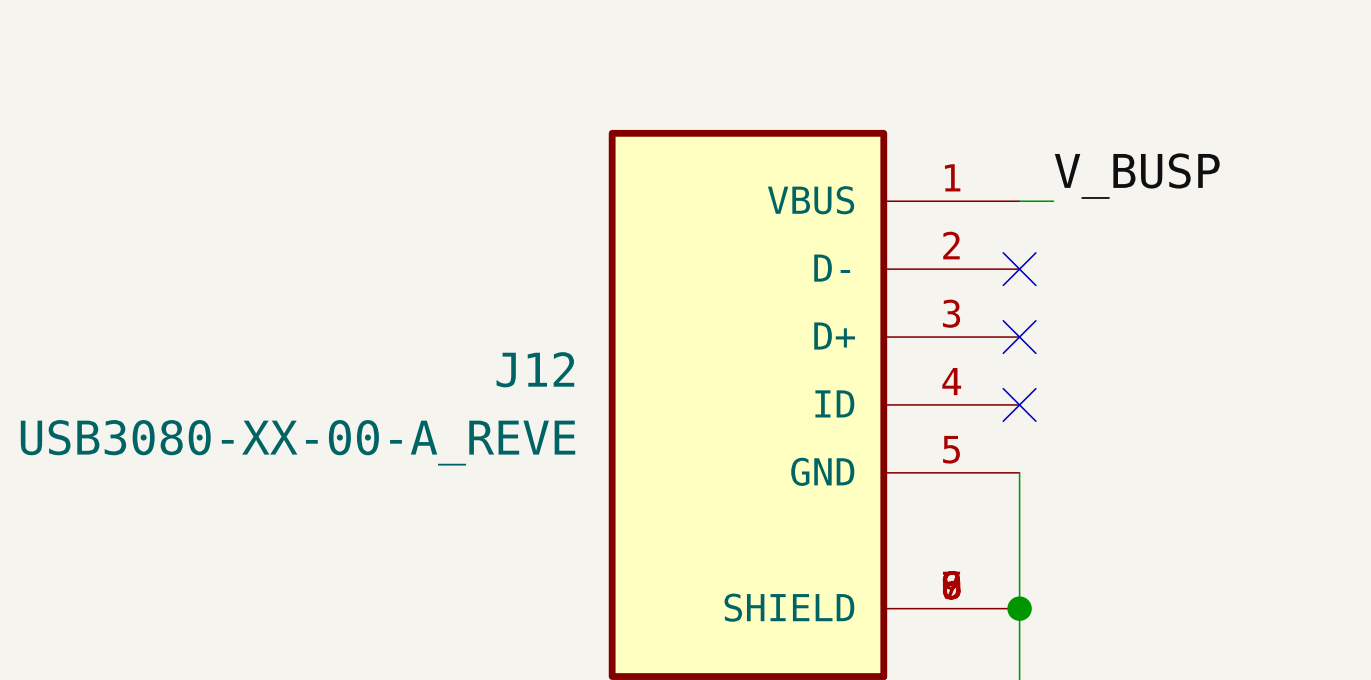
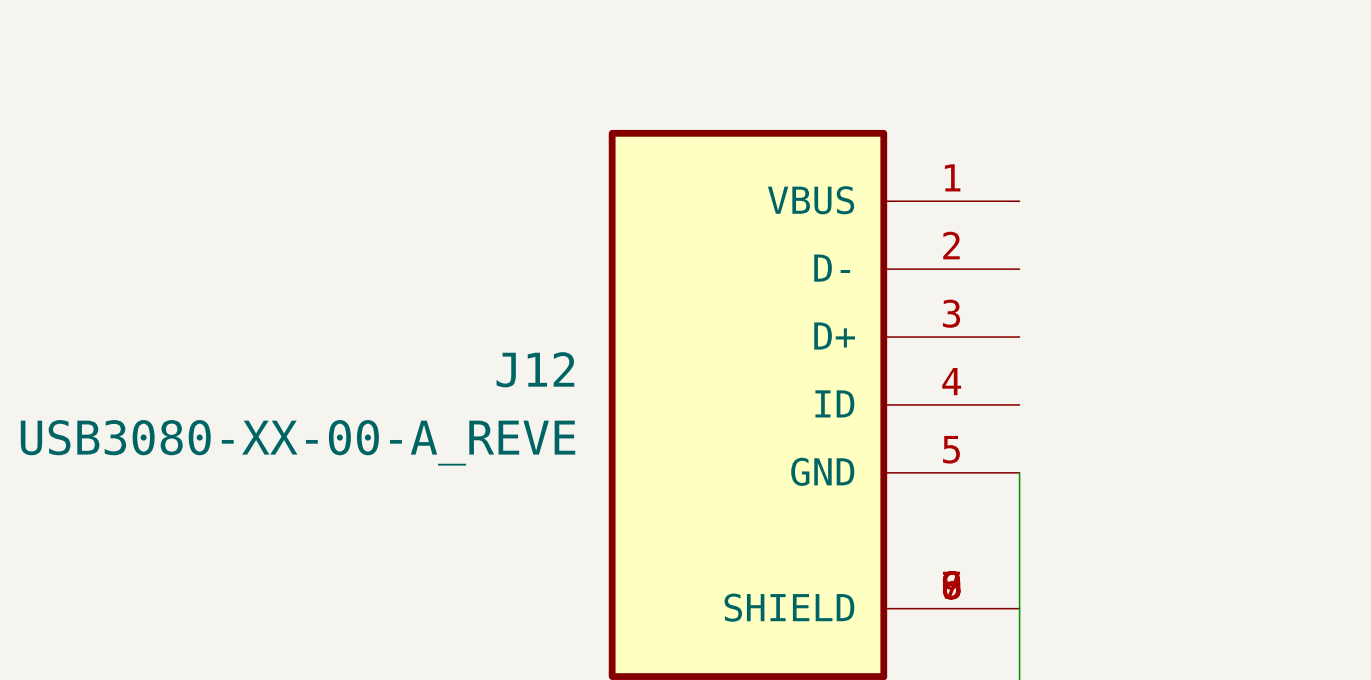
label: V_BUSP (1137, 176) -> none
wire: (1019, 201) (1053, 201) -> none
no-connect mark: (1019, 269) -> none
no-connect mark: (1019, 337) -> none
no-connect mark: (1019, 404) -> none
junction: (1019, 608) -> none

